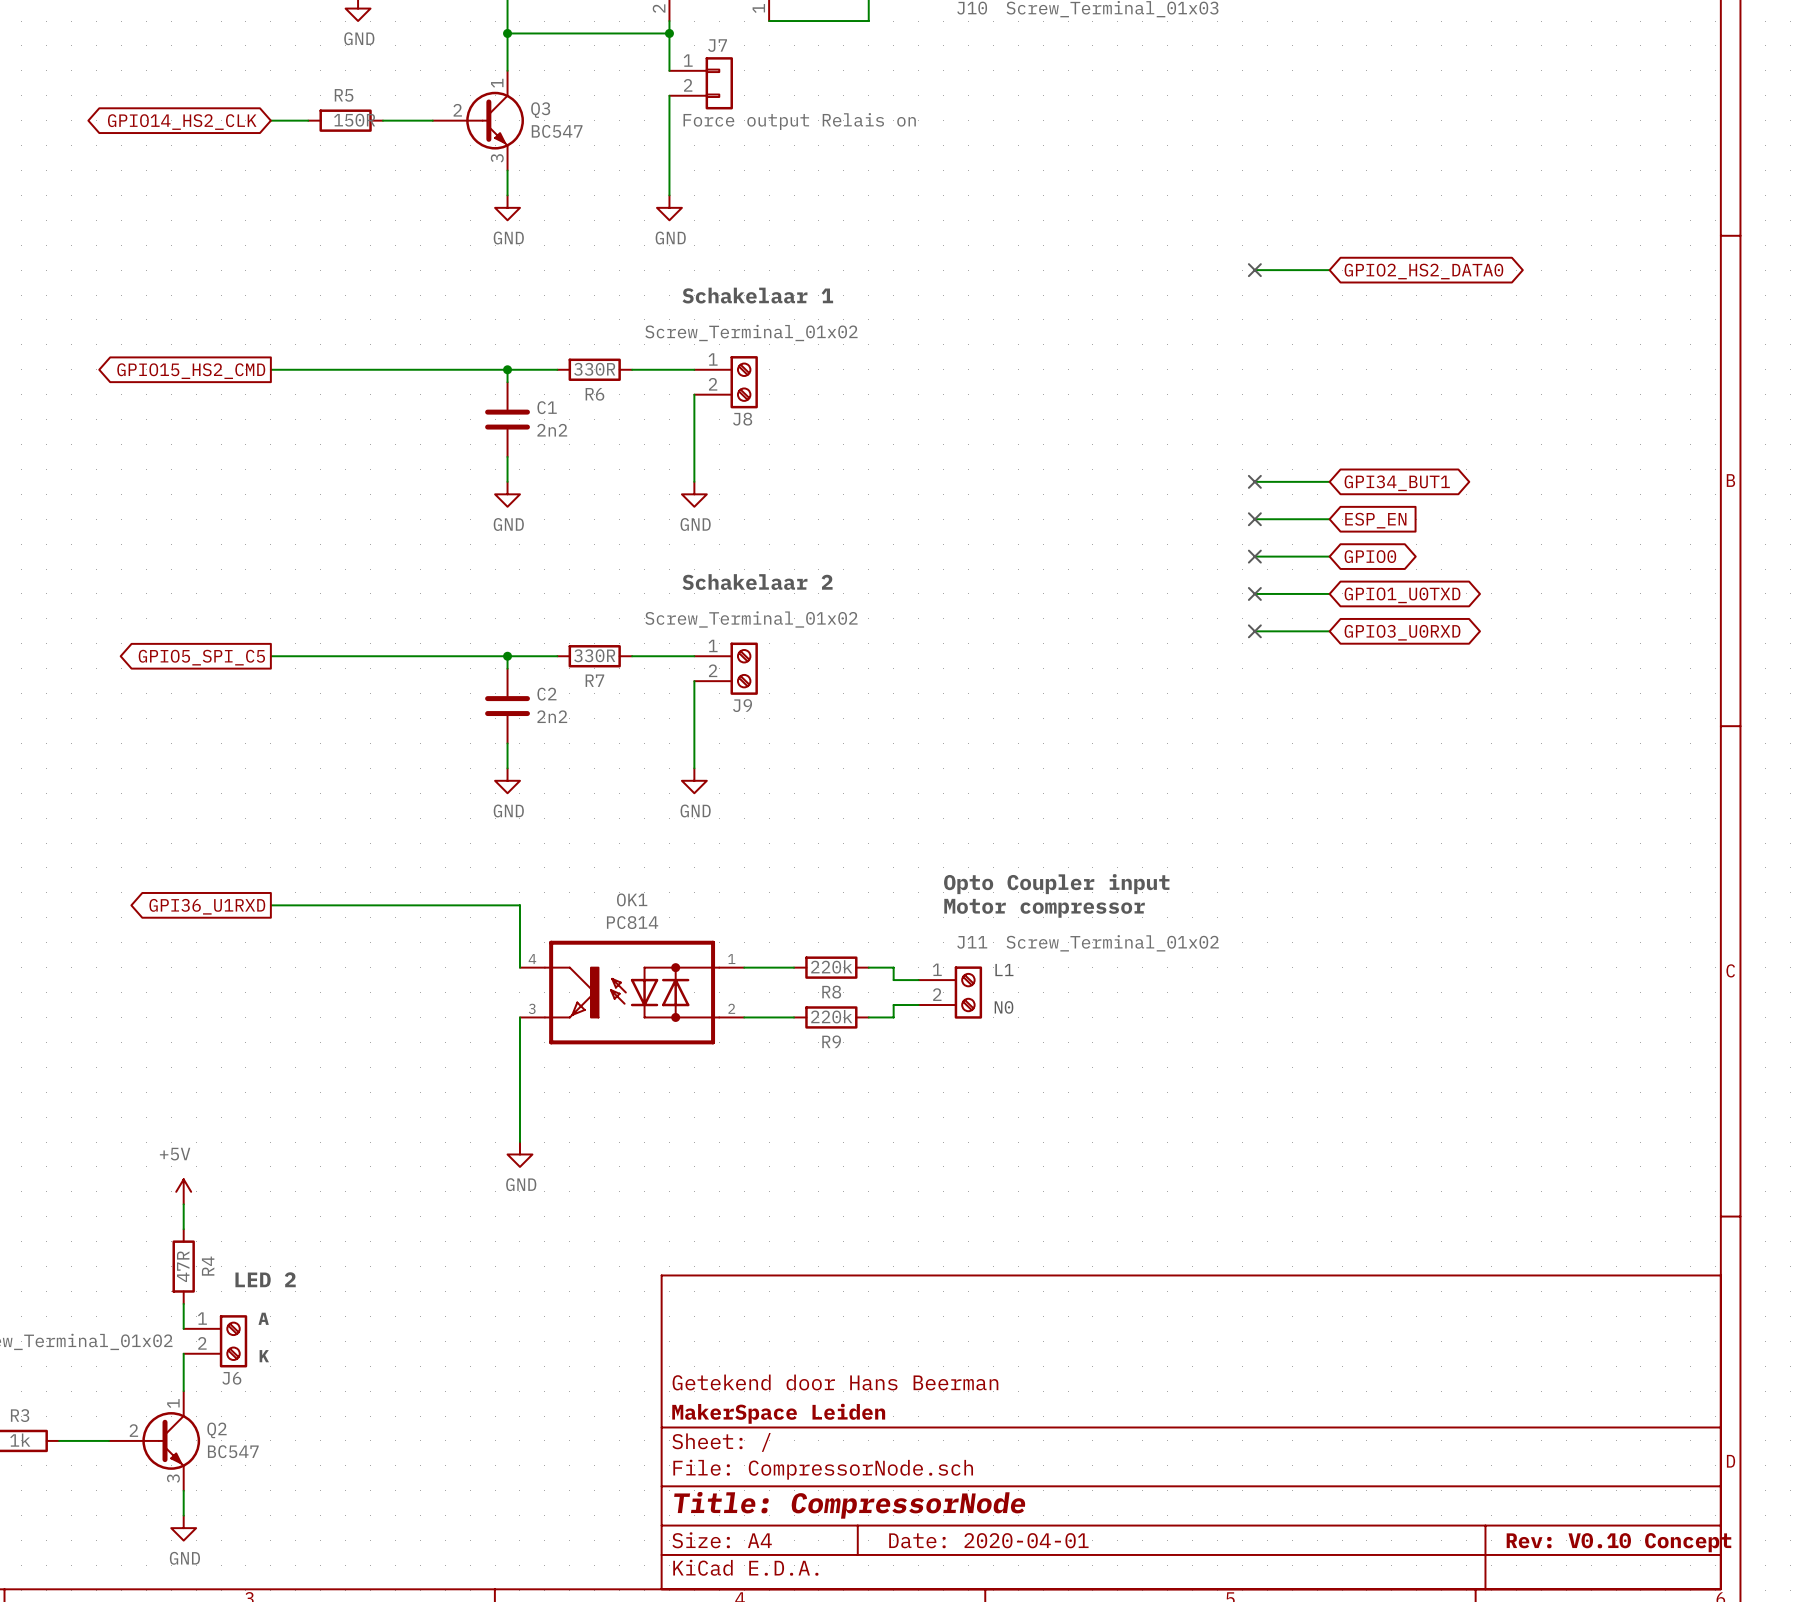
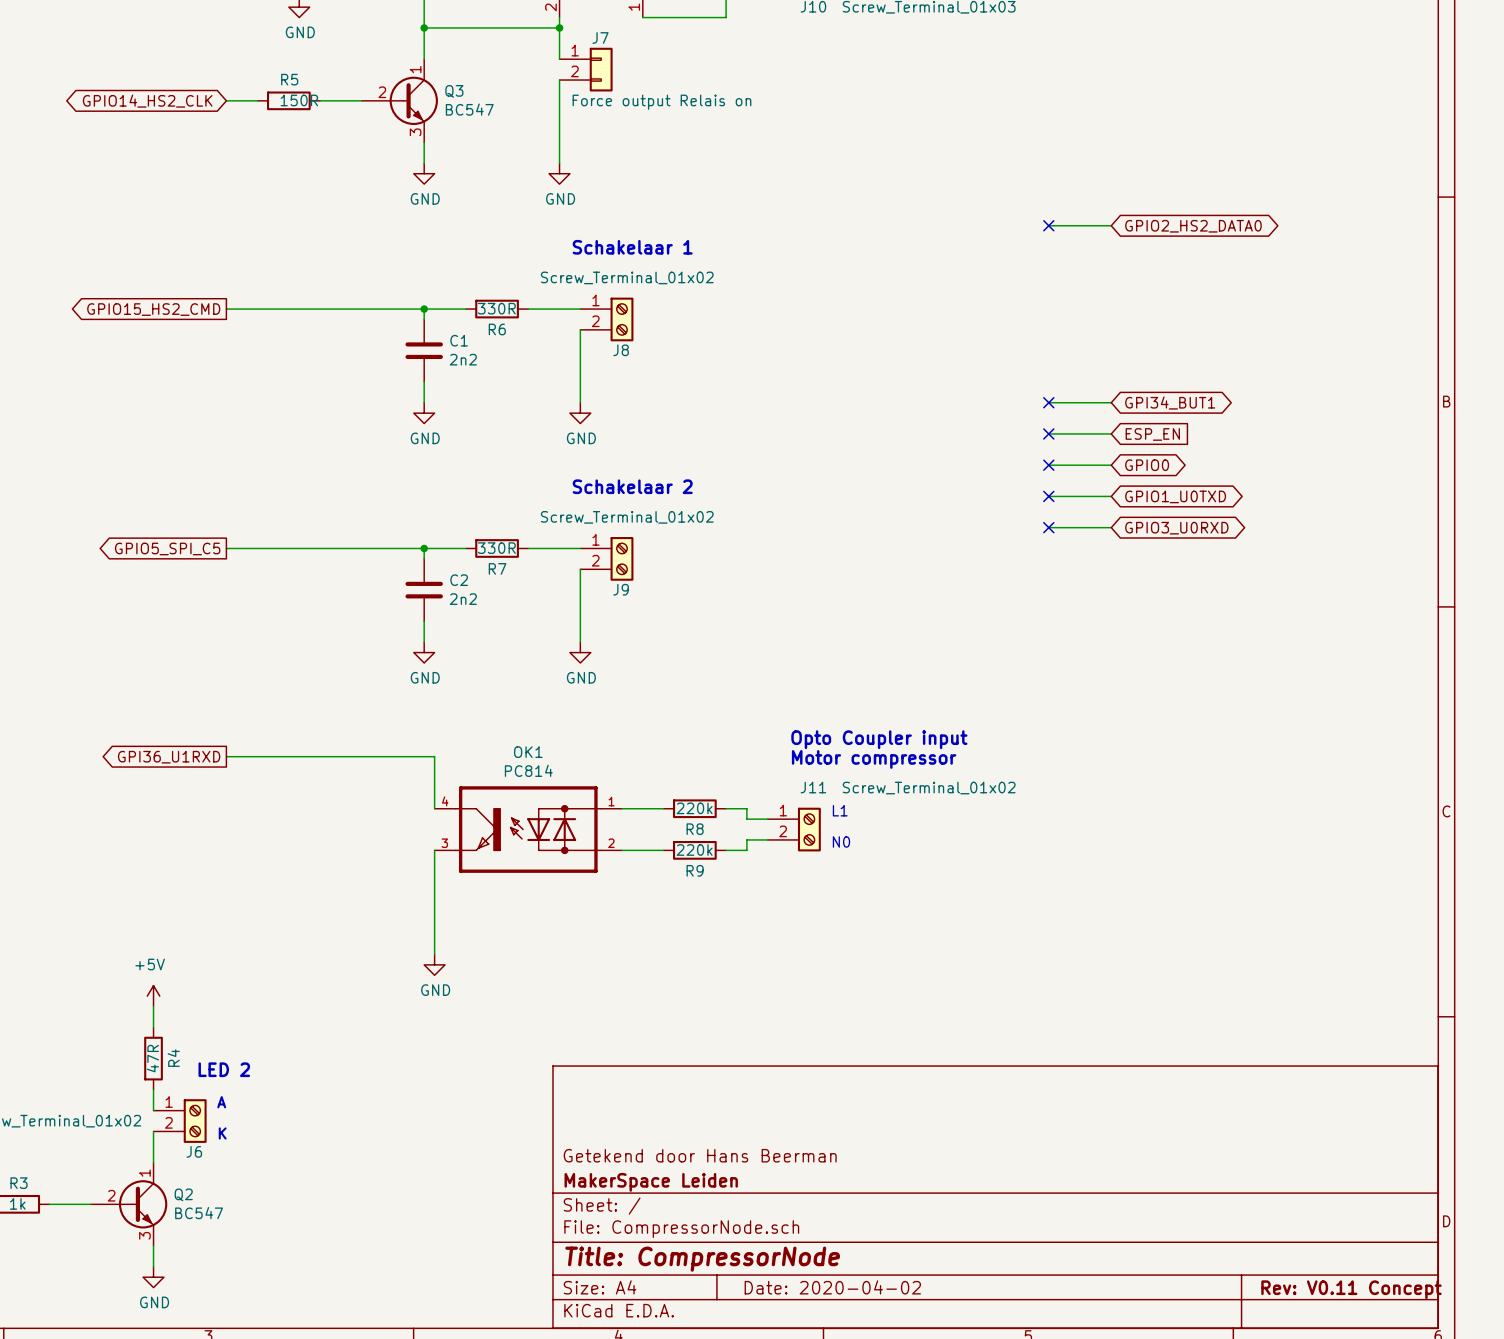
title block: Date: 2020-04-01 (988, 1540) -> Date: 2020-04-02 (832, 1287)
title block: Rev: V0.10 Concept (1618, 1542) -> Rev: V0.11 Concept (1351, 1289)

